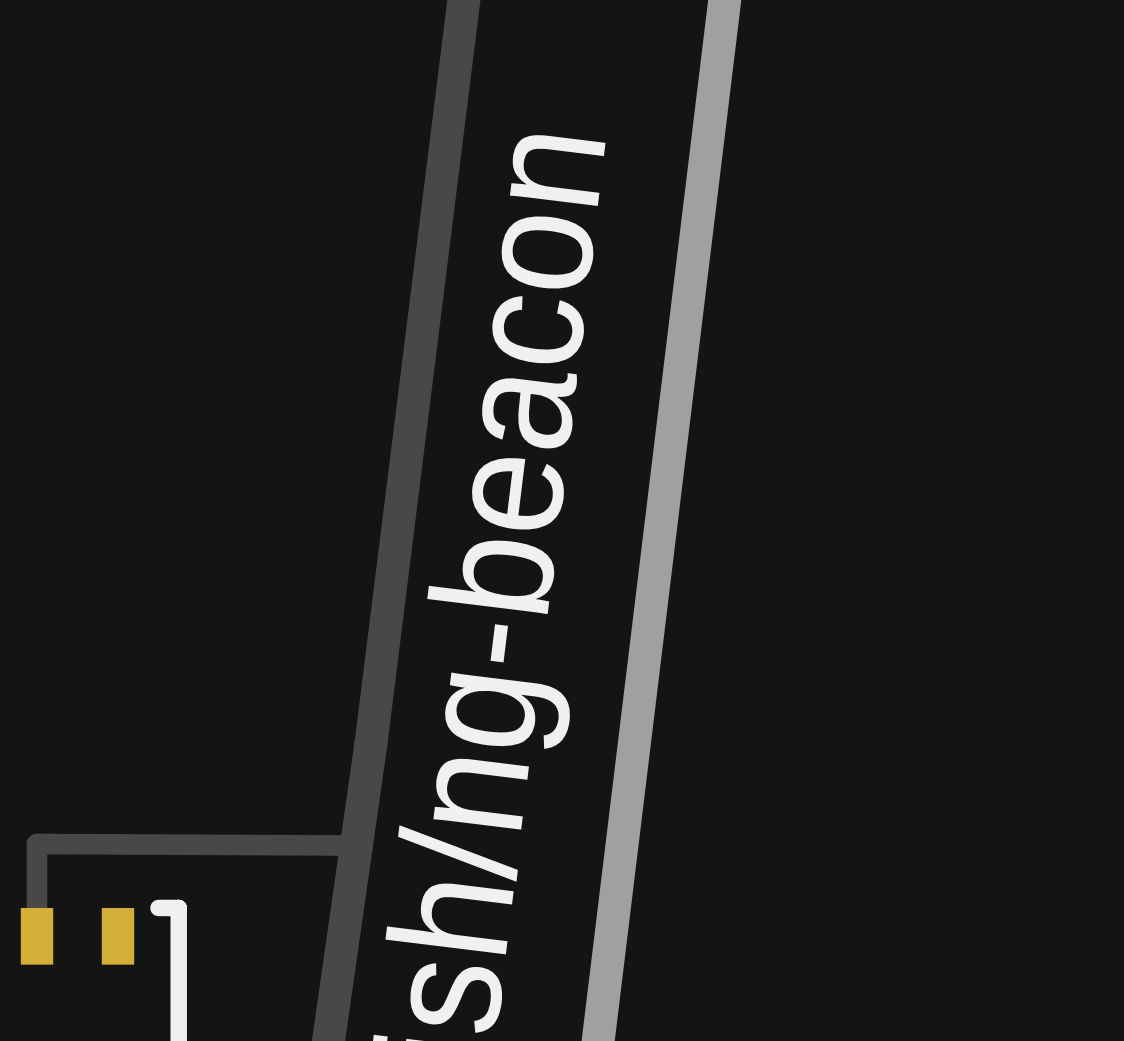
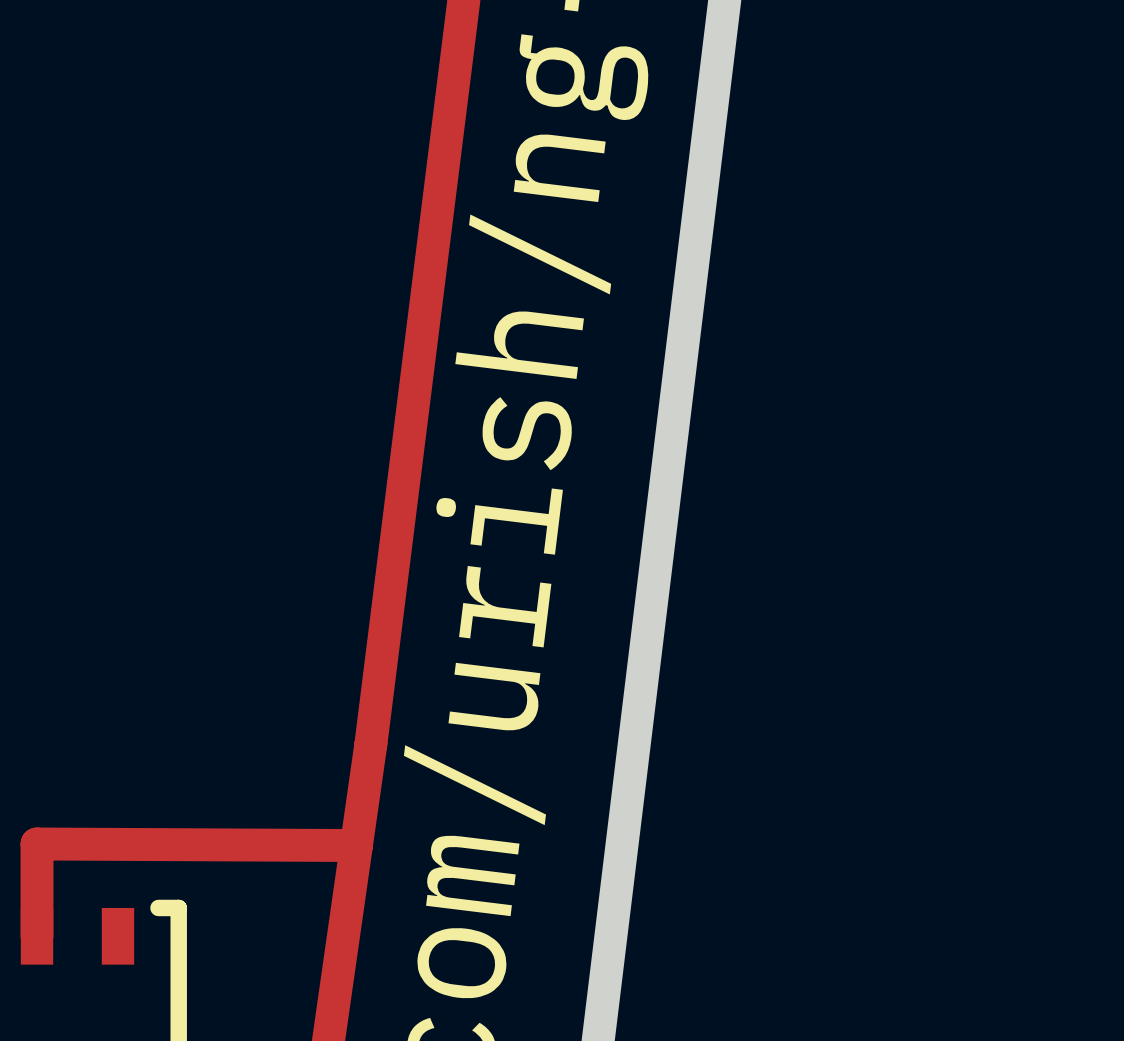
track width: thin (356, 845) (37, 843) (37, 936) -> thick (356, 845) (37, 843) (37, 936)

